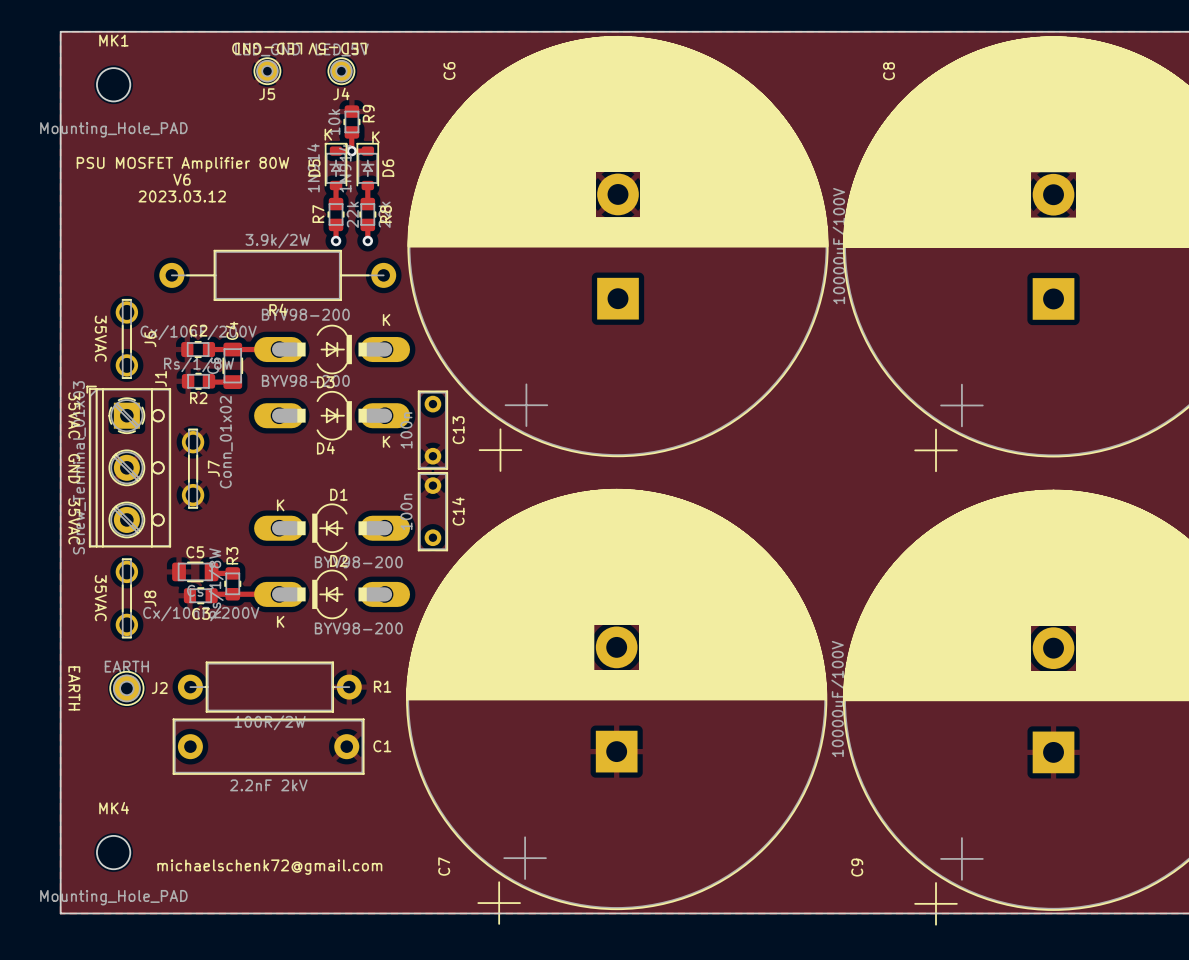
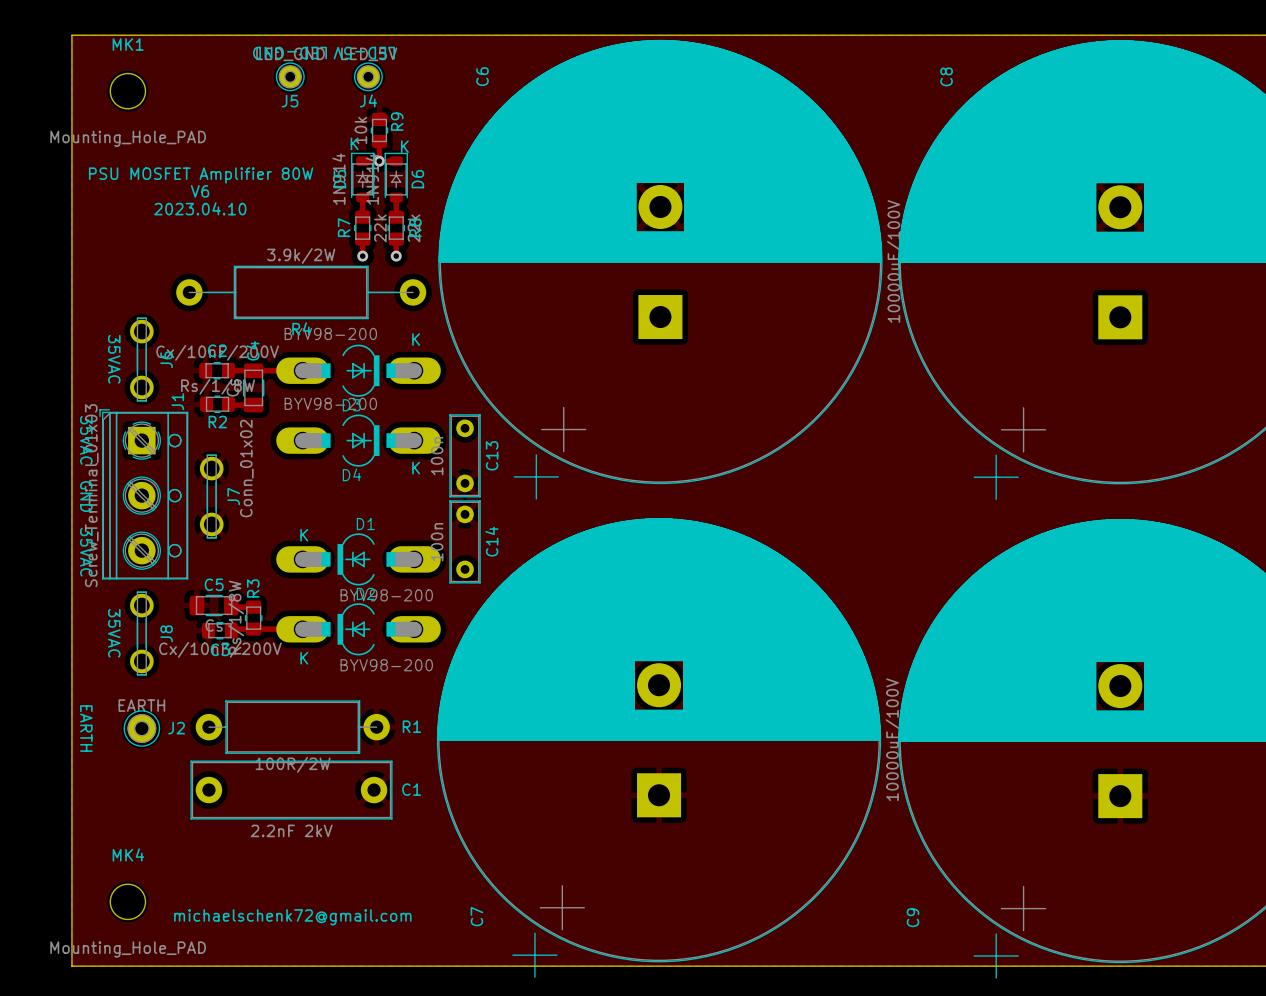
text: 2023.03.12 (182, 196) -> 2023.04.10 (200, 208)

